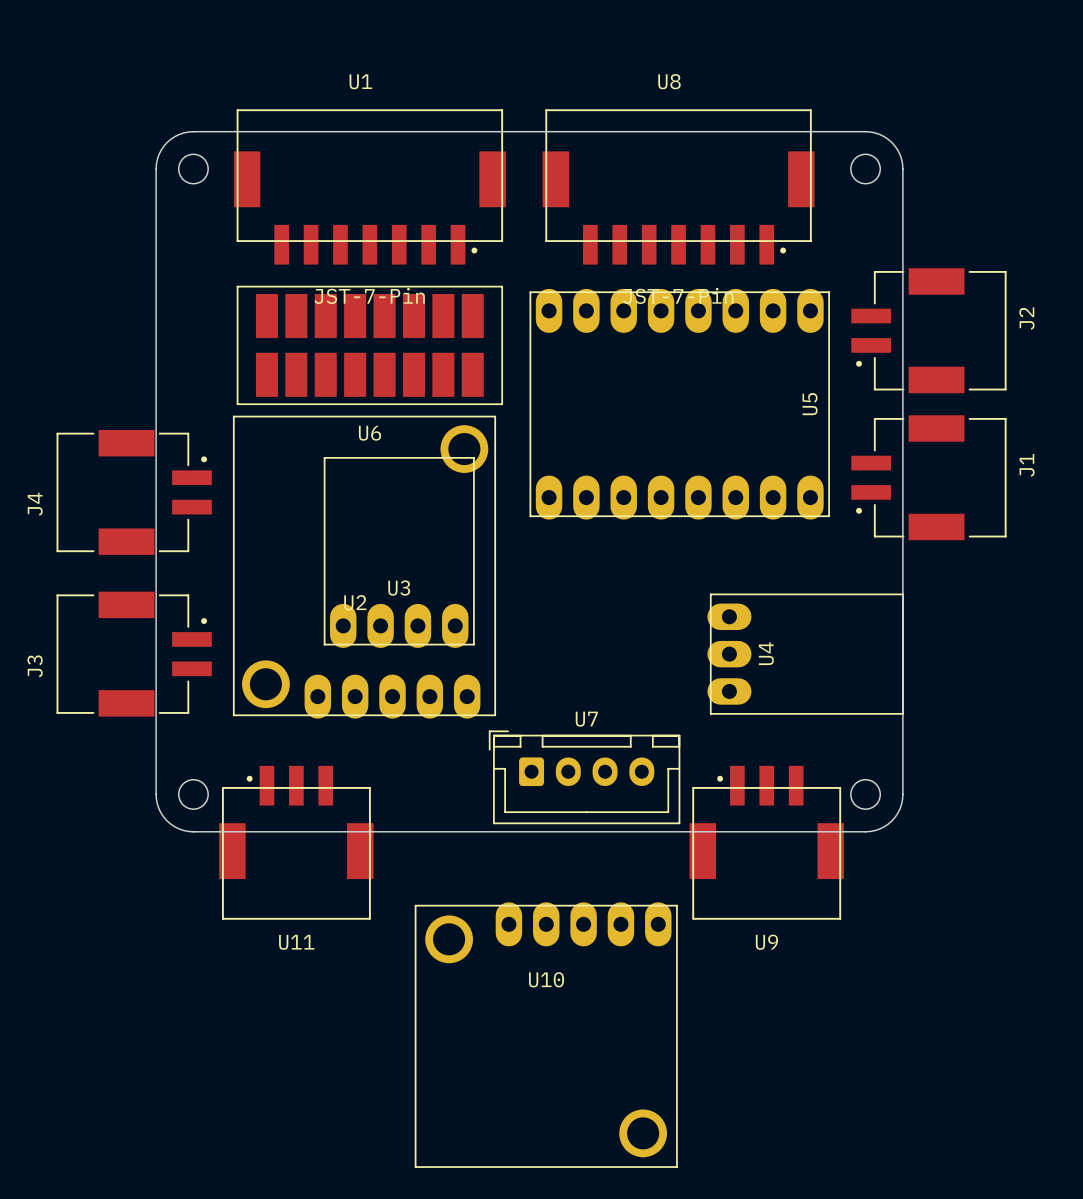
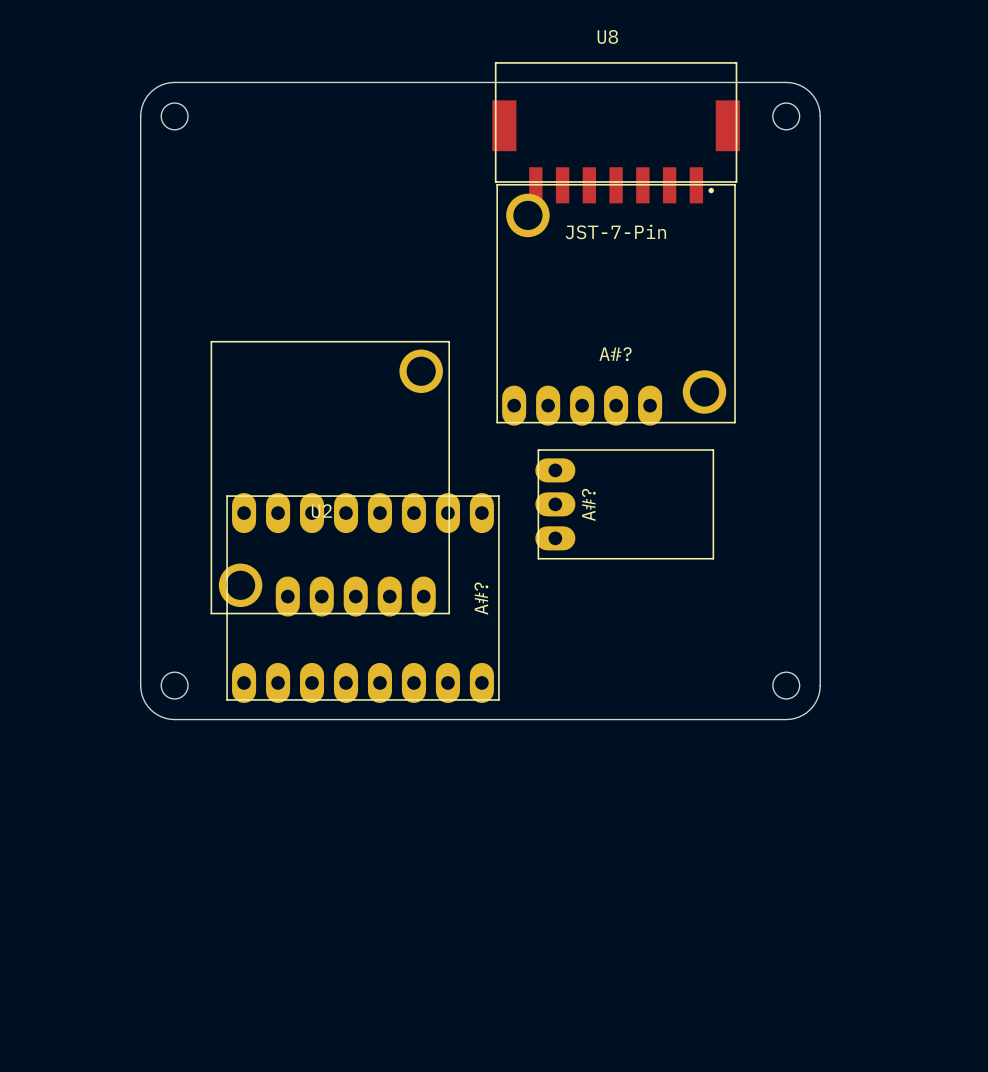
U1: JST-7-Pin (369, 186) -> none
J2: (928, 330) -> none
U6: (369, 345) -> none
A#?: none -> (616, 304)
U5: (679, 404) -> none
J1: (928, 477) -> none
J4: (134, 492) -> none
U3: (399, 552) -> none
A#?: none -> (624, 504)
J3: (134, 654) -> none
U4: (805, 654) -> none
A#?: none -> (362, 598)
U7: (584, 777) -> none
U11: (296, 842) -> none
U9: (766, 842) -> none
U10: (546, 1035) -> none

